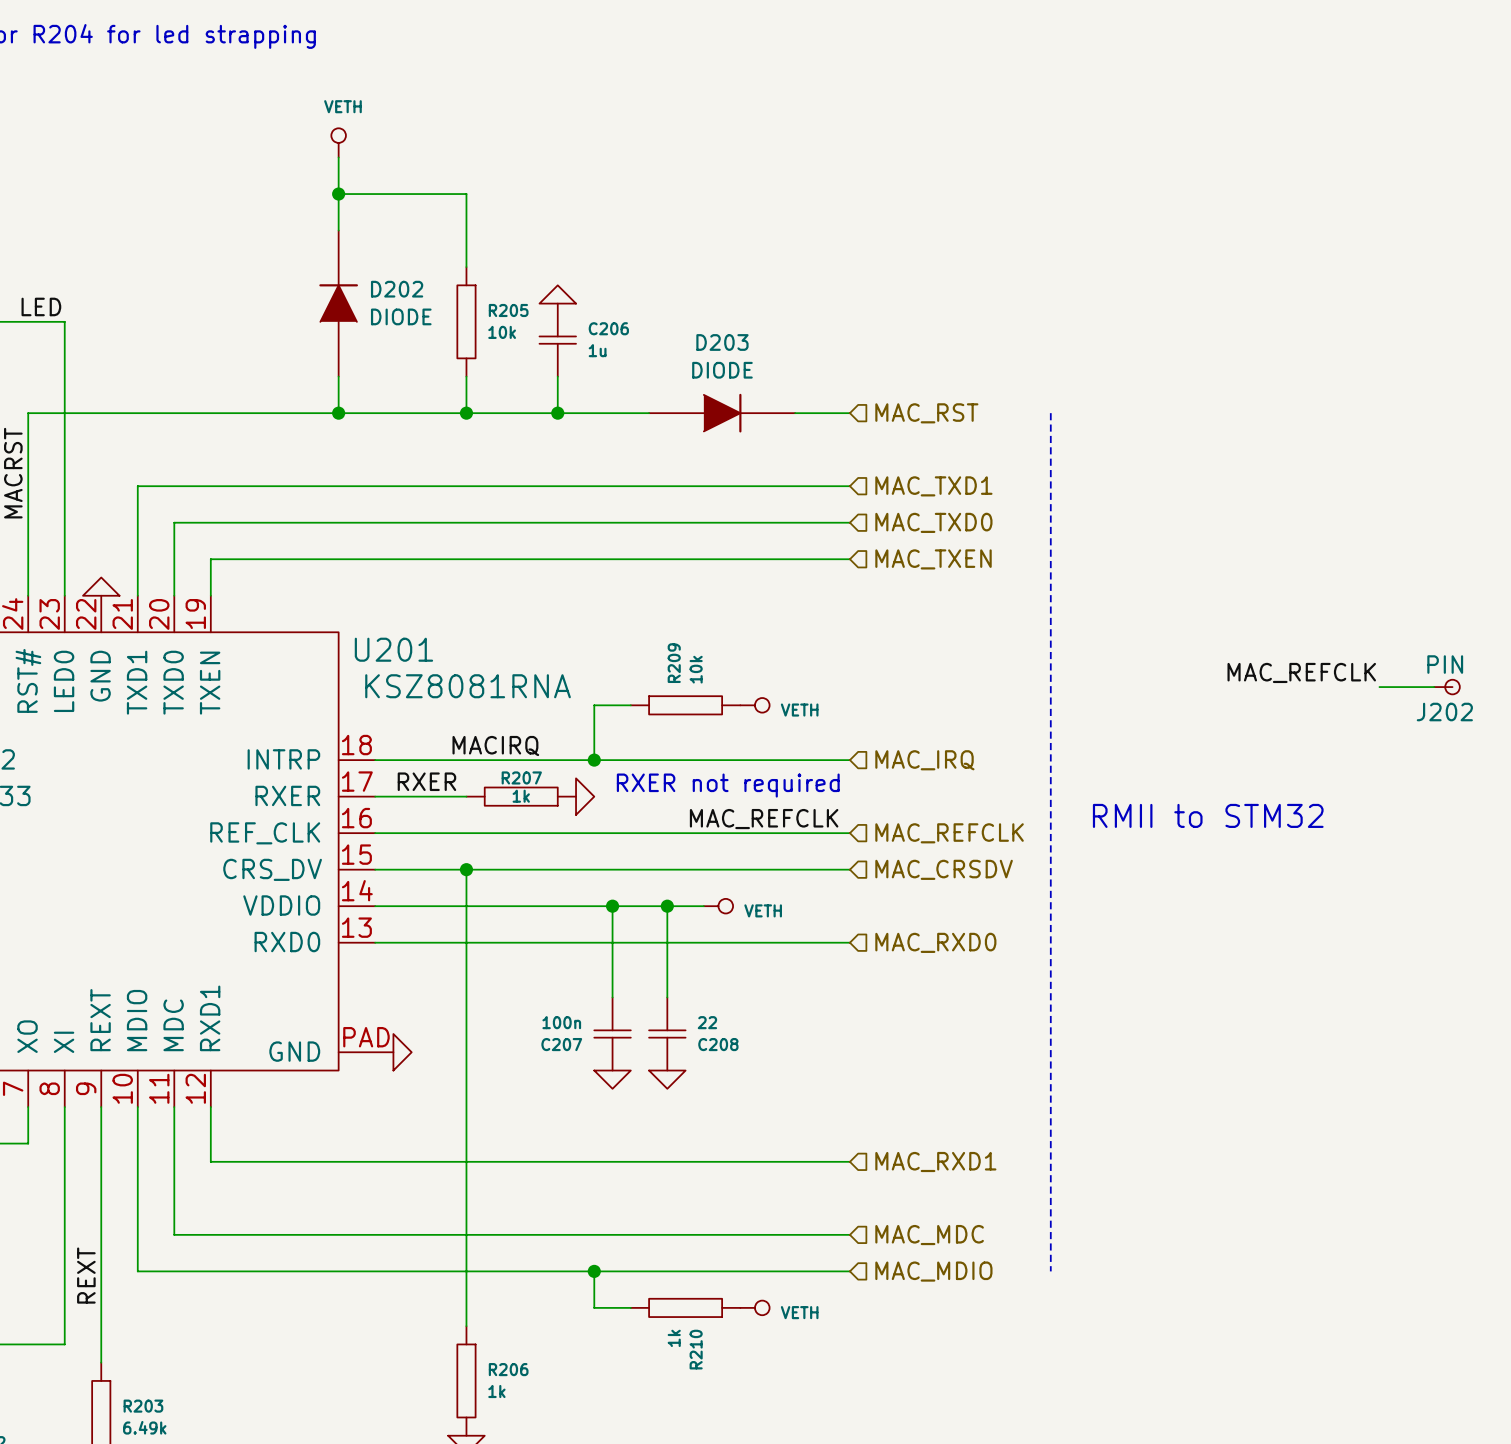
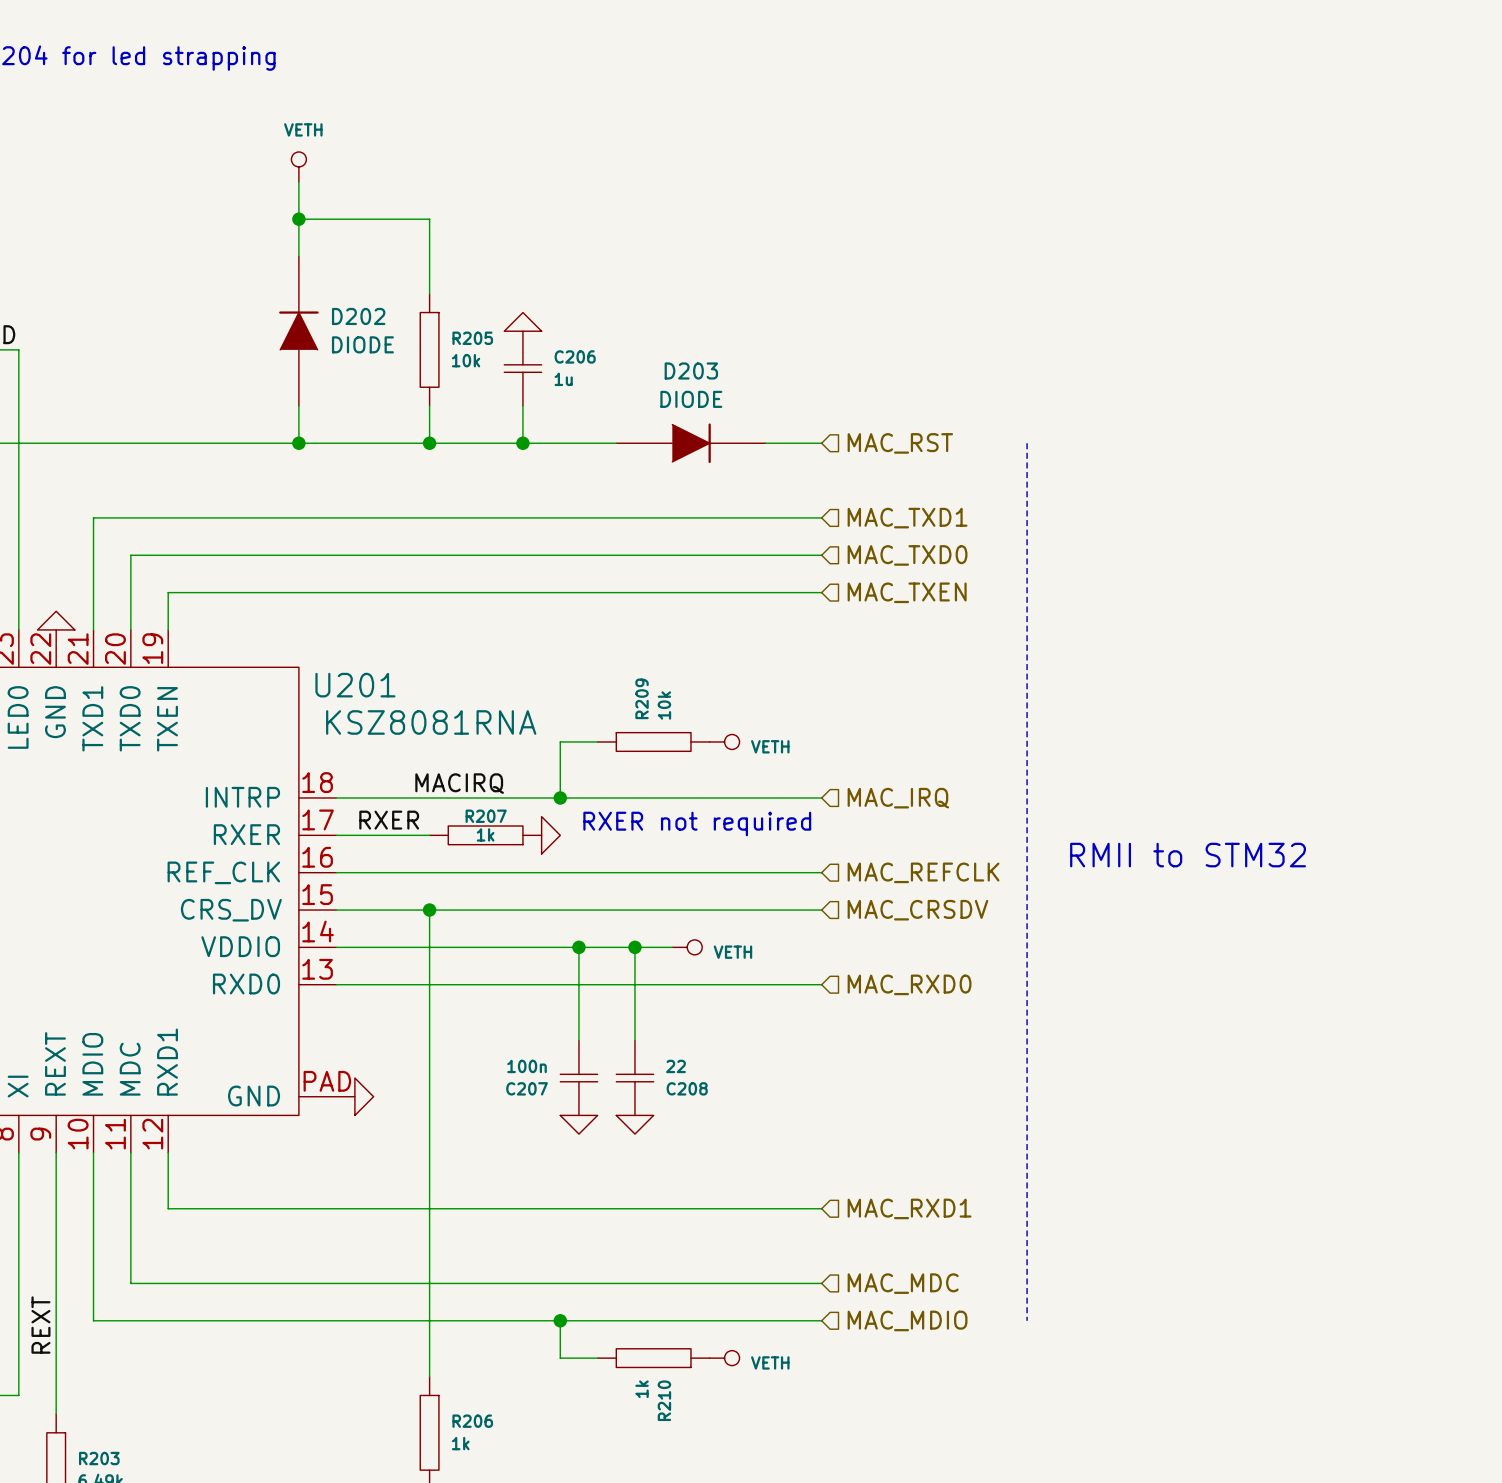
label: MAC_REFCLK (1301, 672) -> none
wire: (1379, 687) (1434, 687) -> none
J202: PIN (1447, 687) -> none
label: MAC_REFCLK (764, 819) -> none

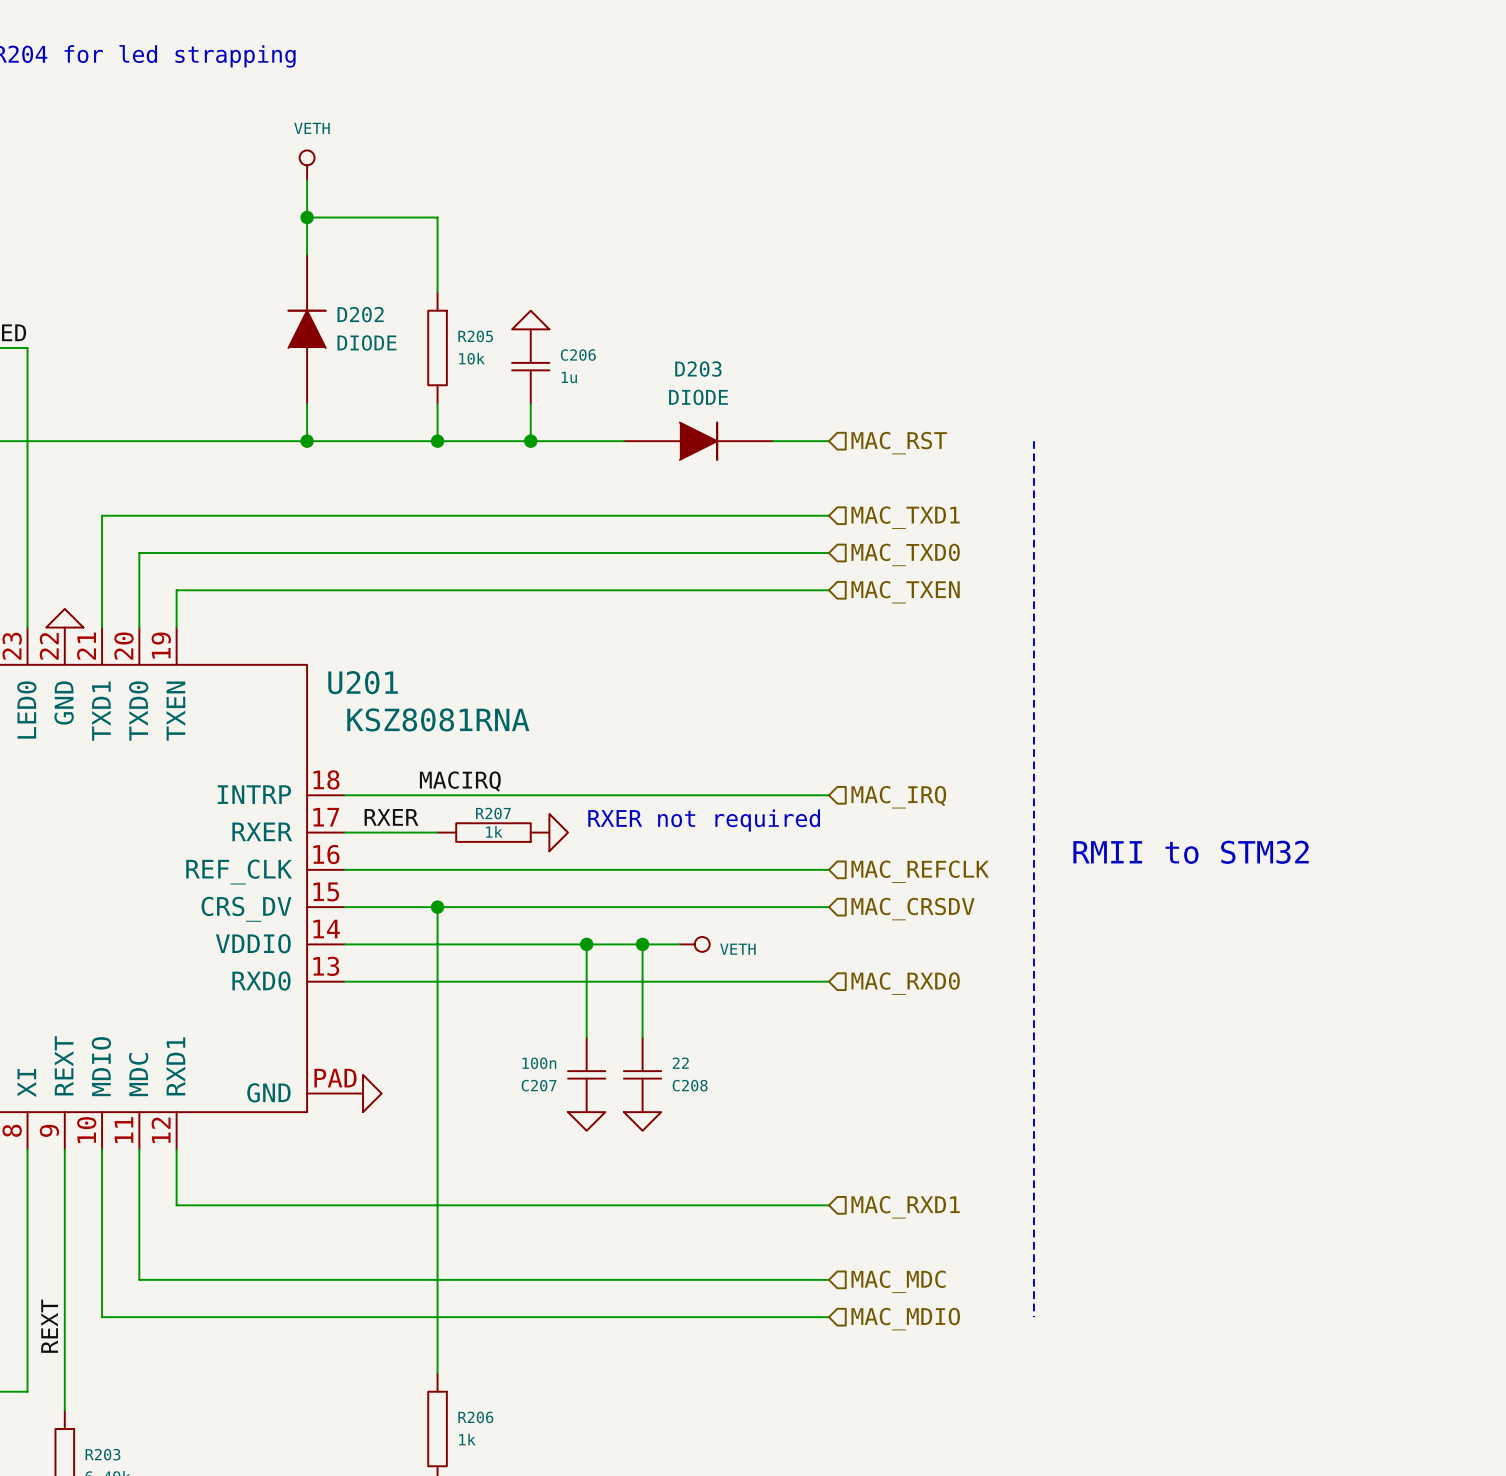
wire: (597, 741) (560, 741) (560, 797) -> none
R209: 10k (653, 741) -> none
power symbol: VETH (724, 741) -> none
junction: (560, 797) -> none
wire: (560, 1320) (560, 1358) (597, 1358) -> none
junction: (560, 1320) -> none
R210: 1k (653, 1358) -> none
power symbol: VETH (724, 1358) -> none

